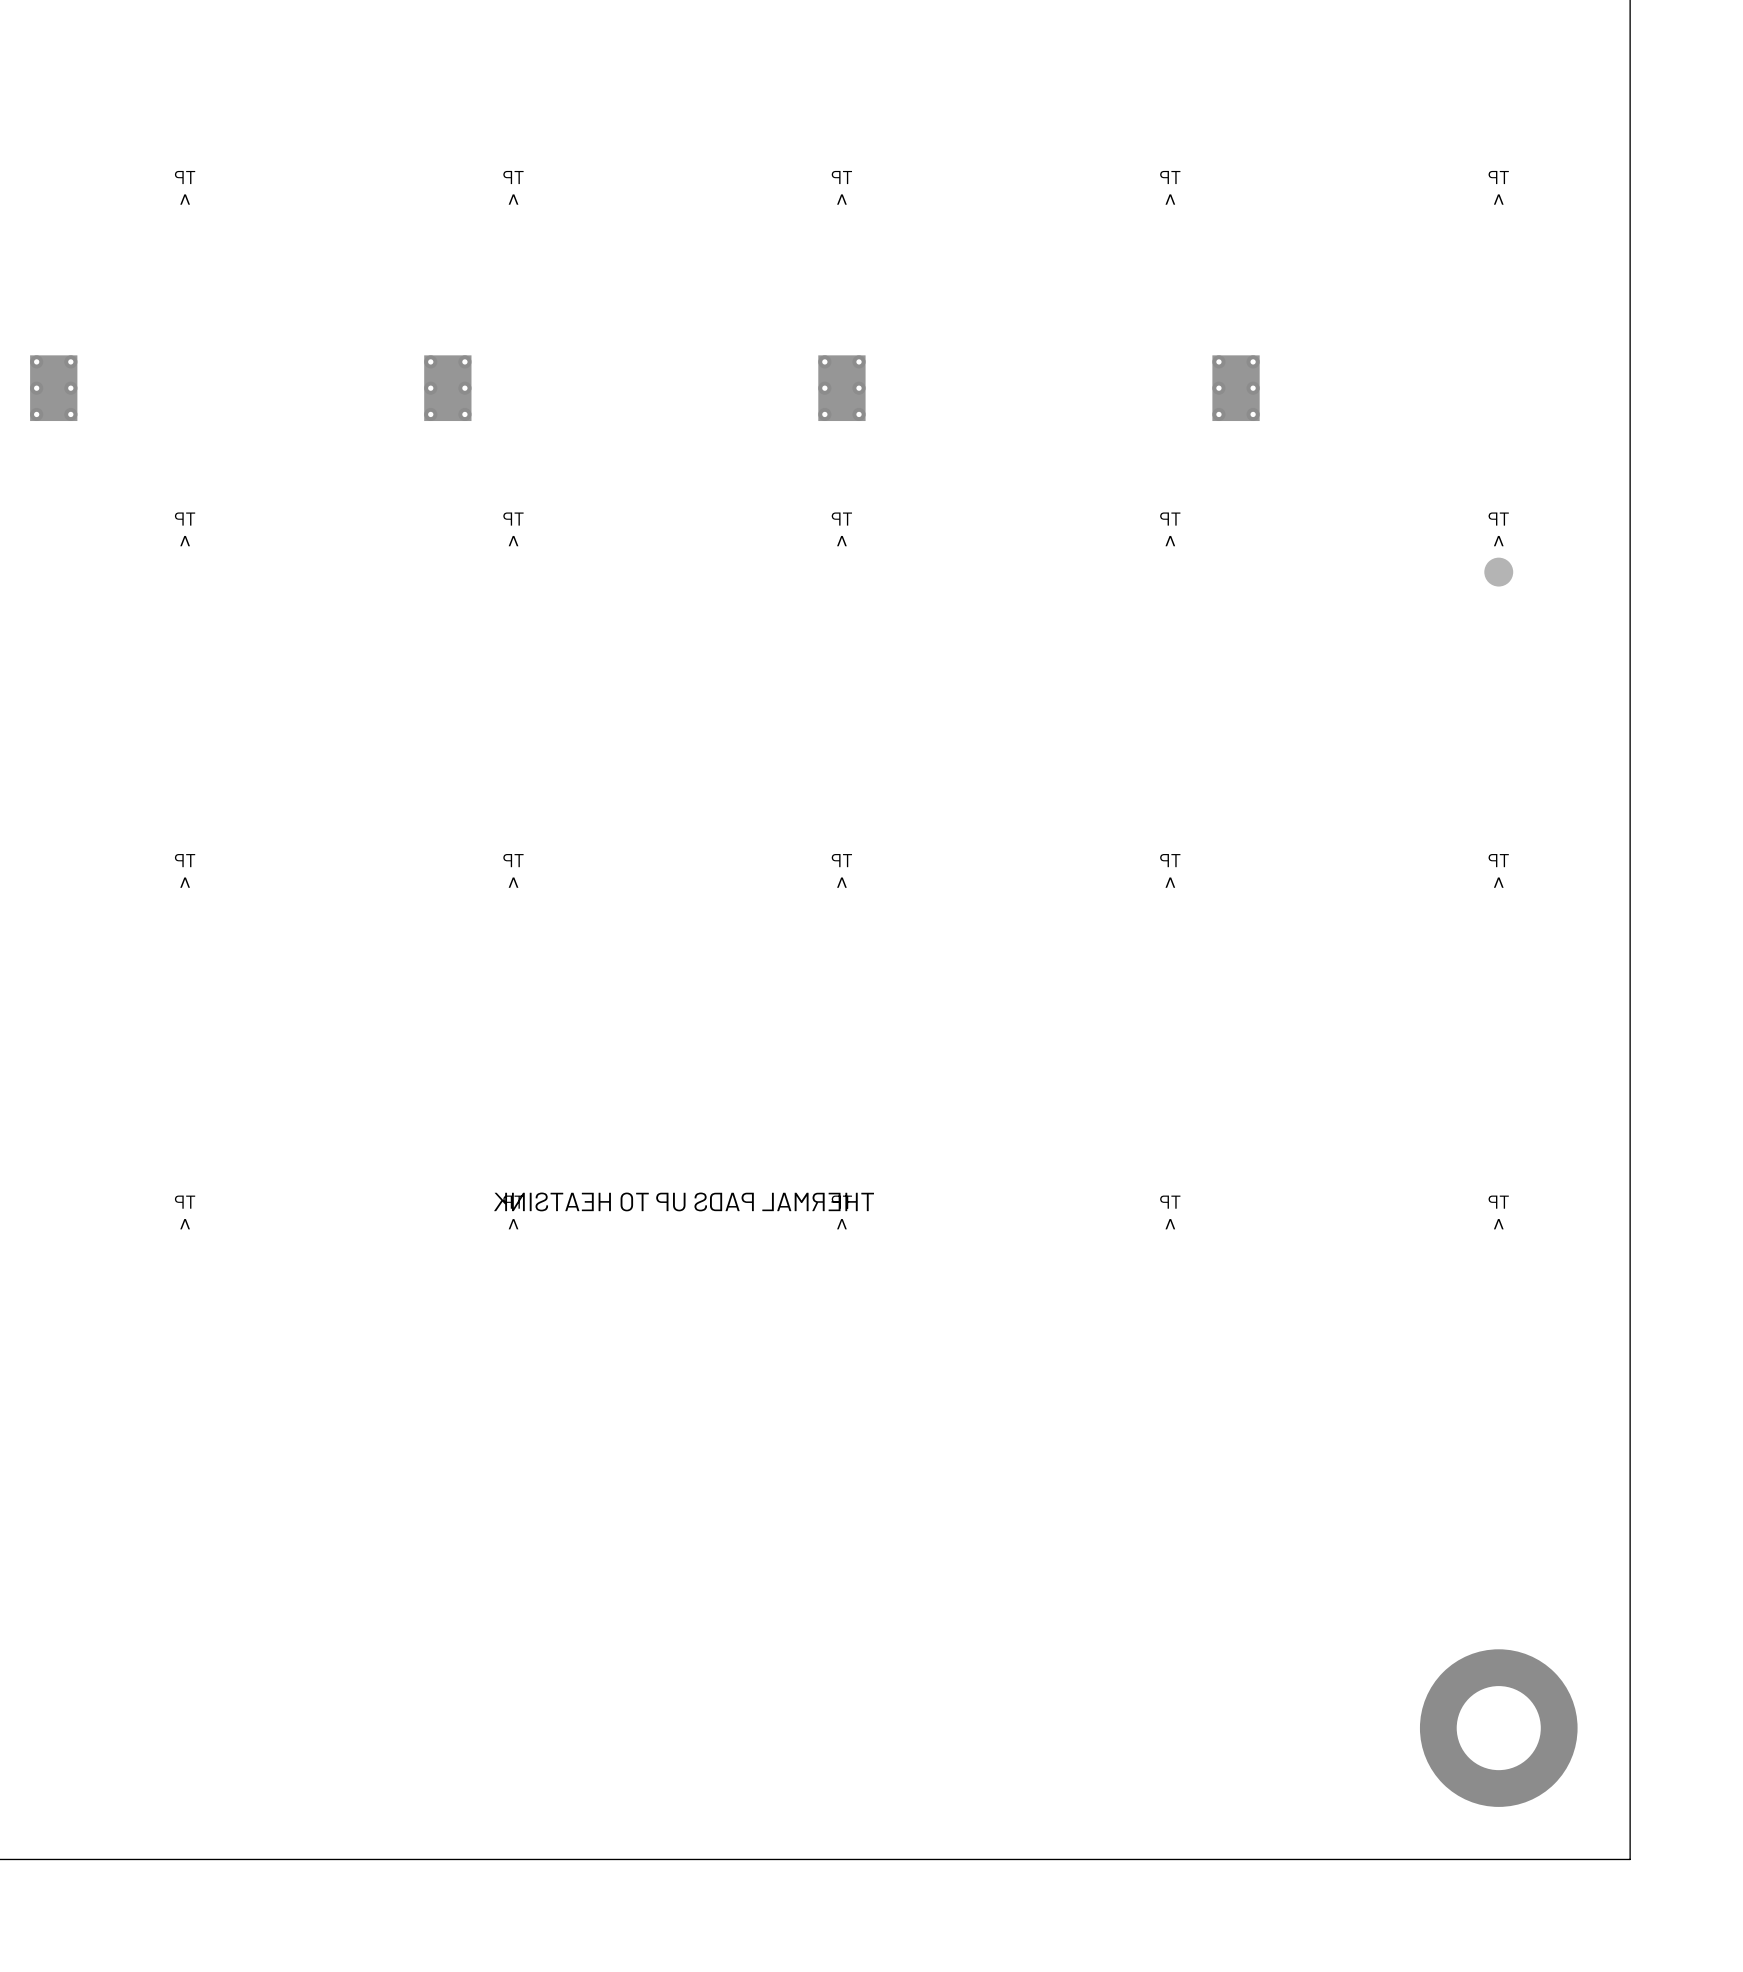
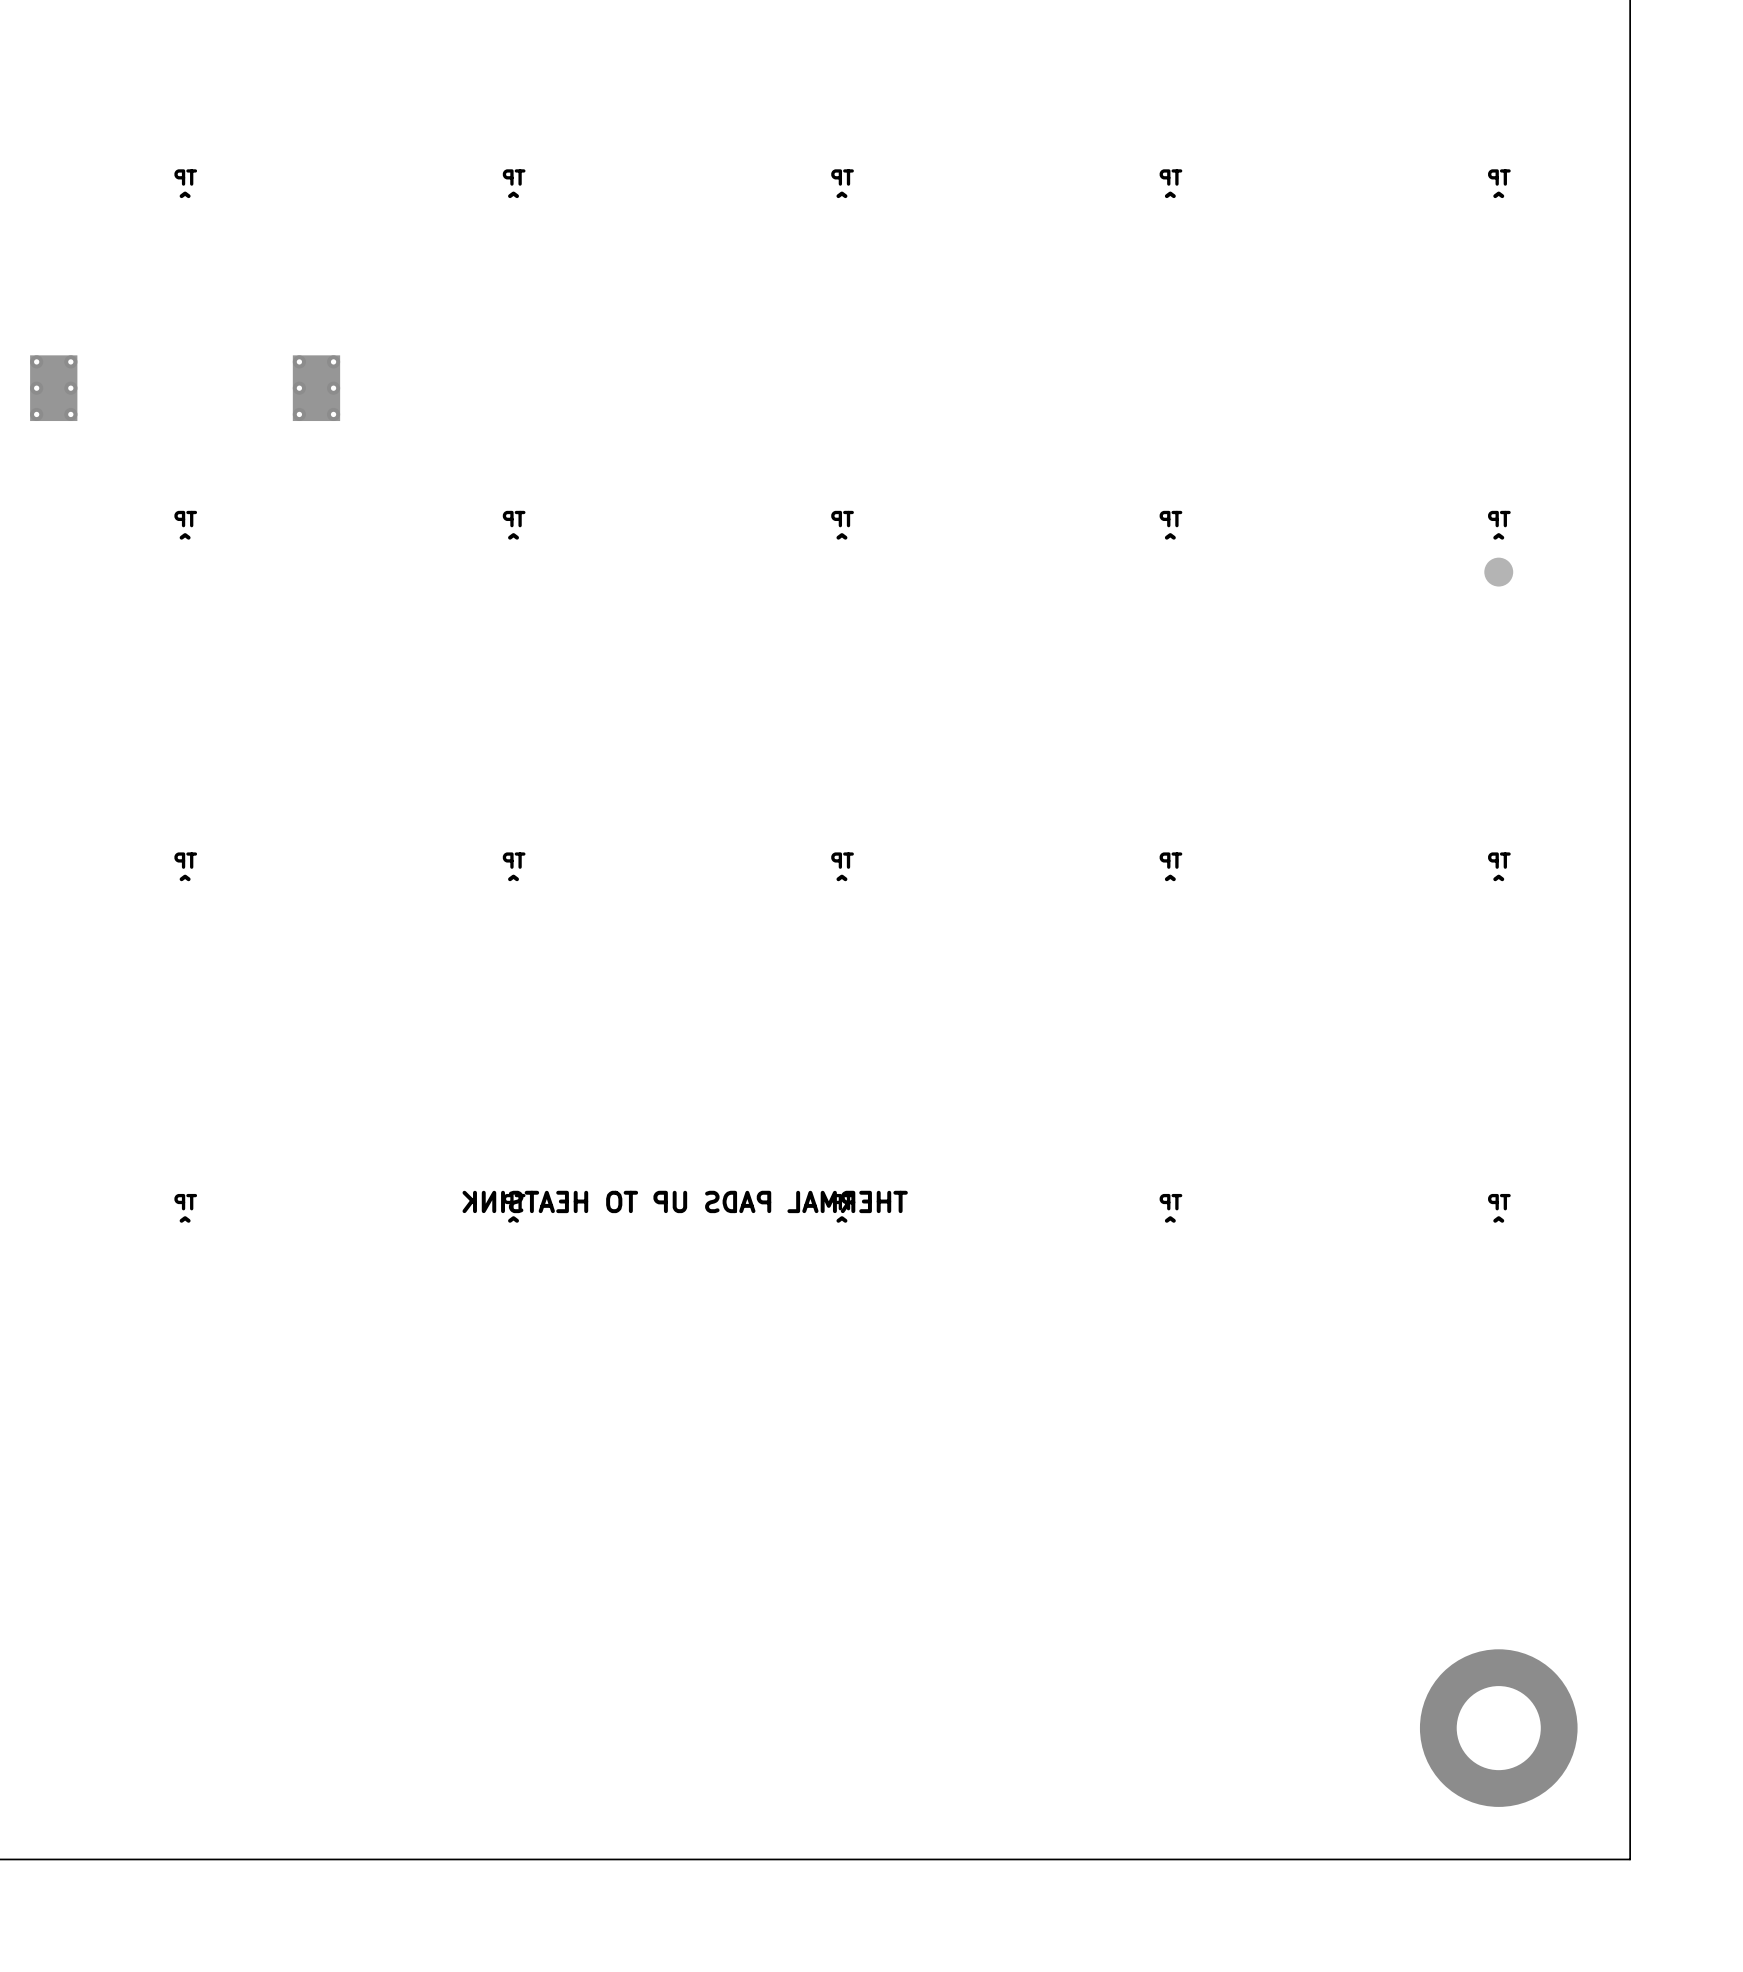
part position: (447, 388) -> (316, 388)
part: (841, 388) -> none
part: (1236, 388) -> none

